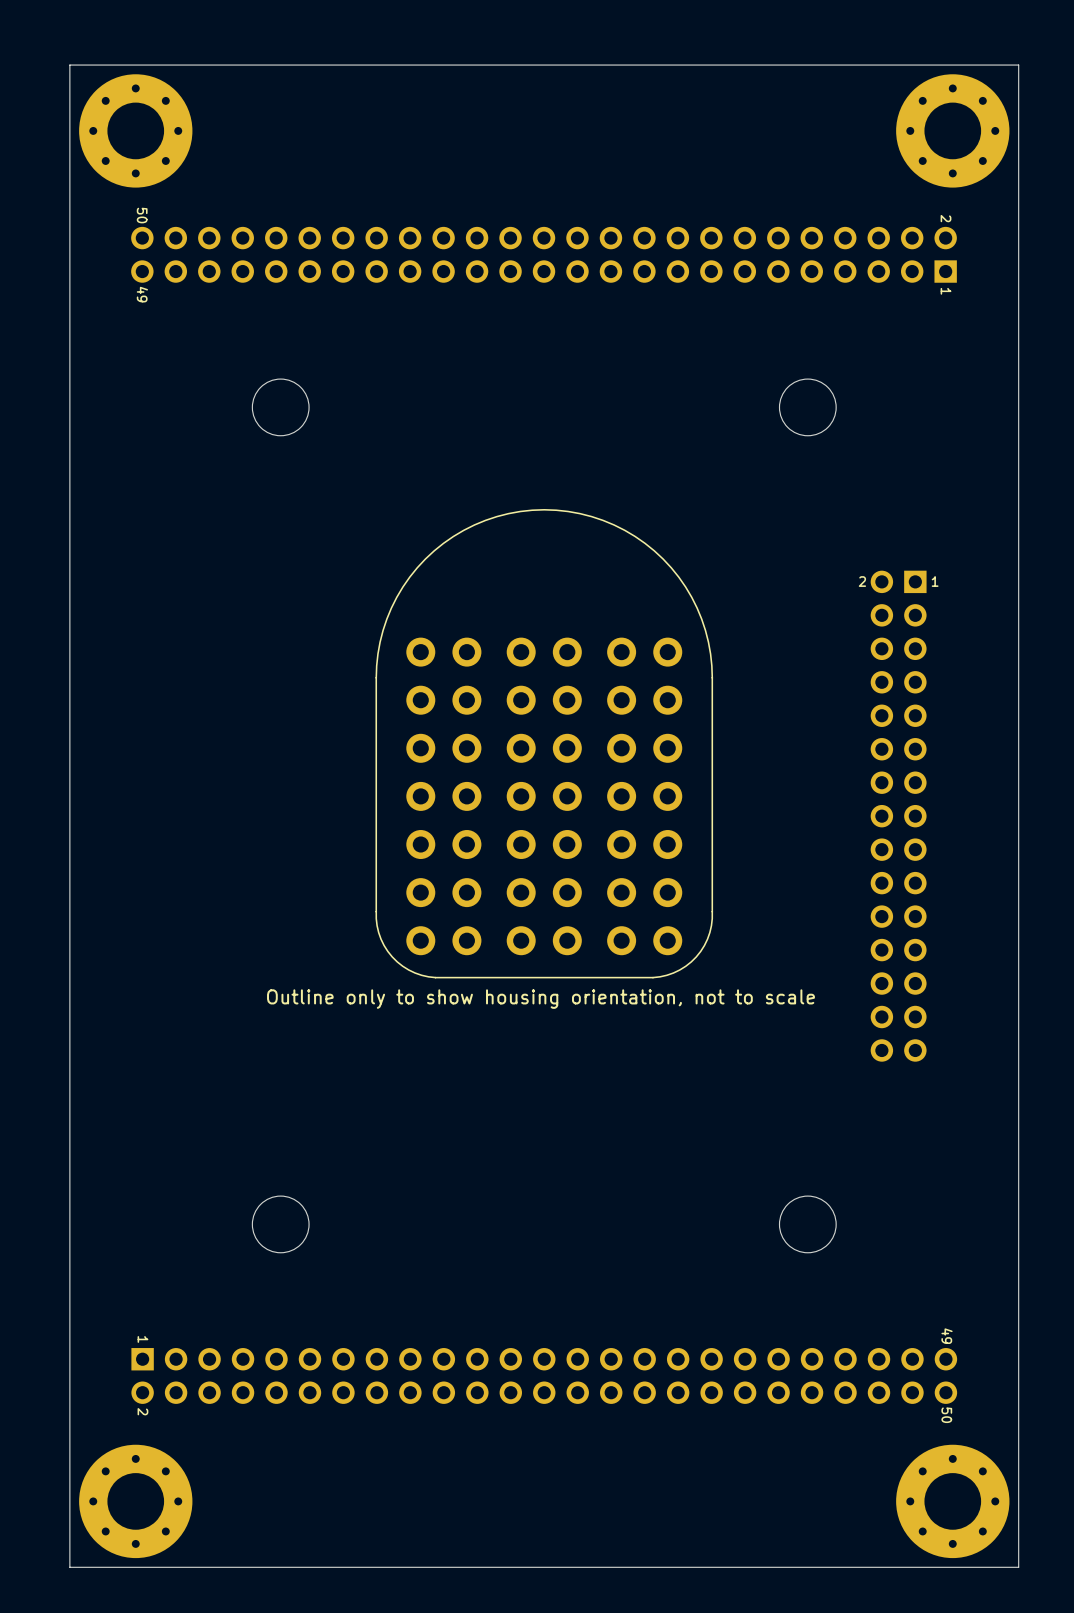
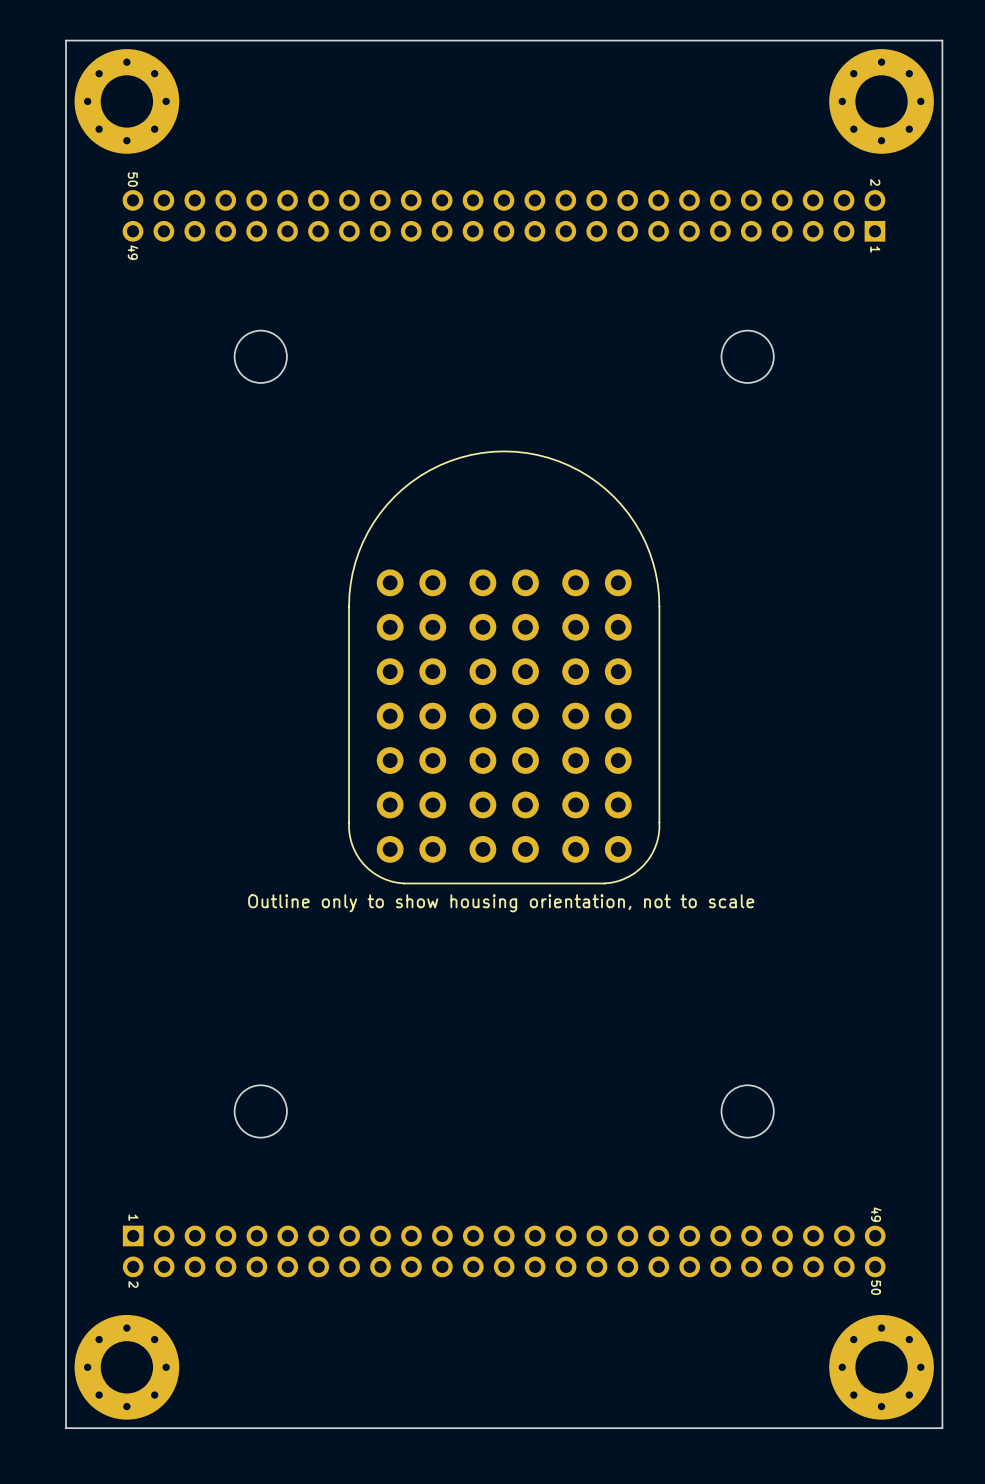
part: (898, 816) -> none

